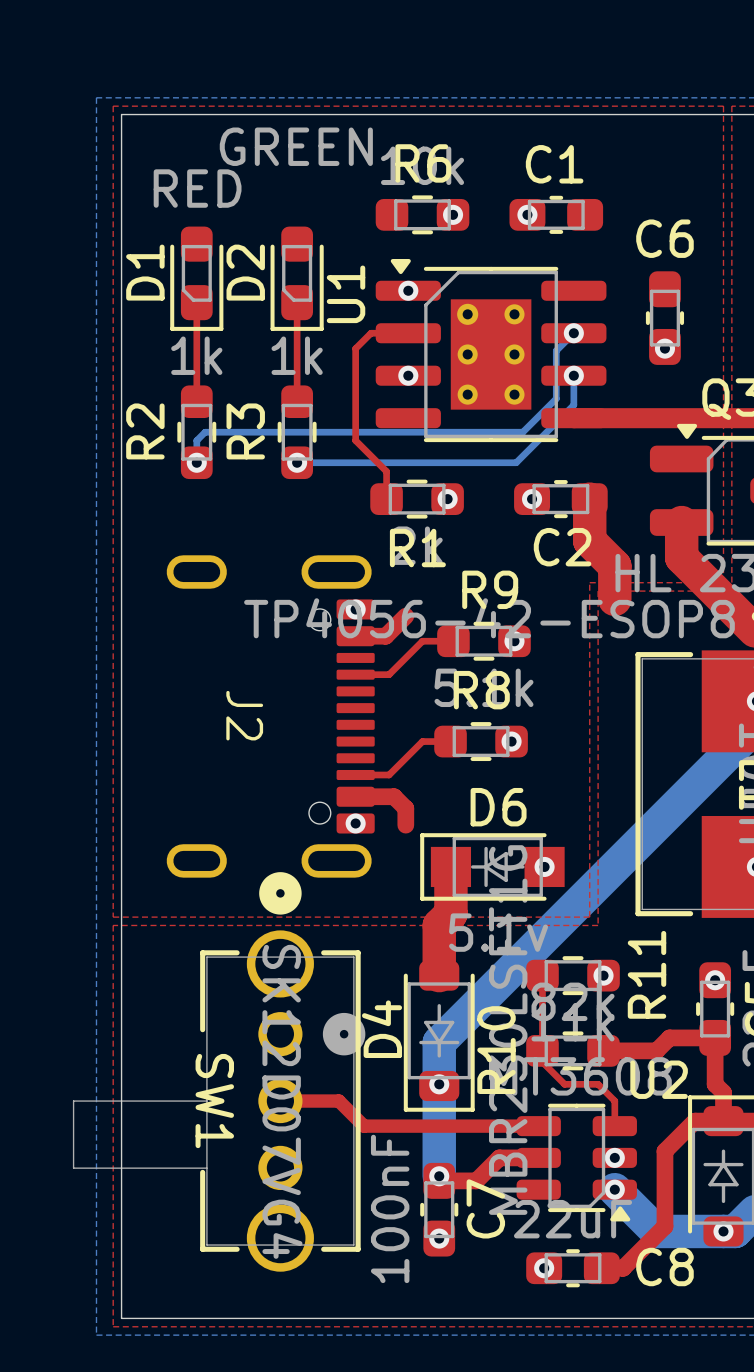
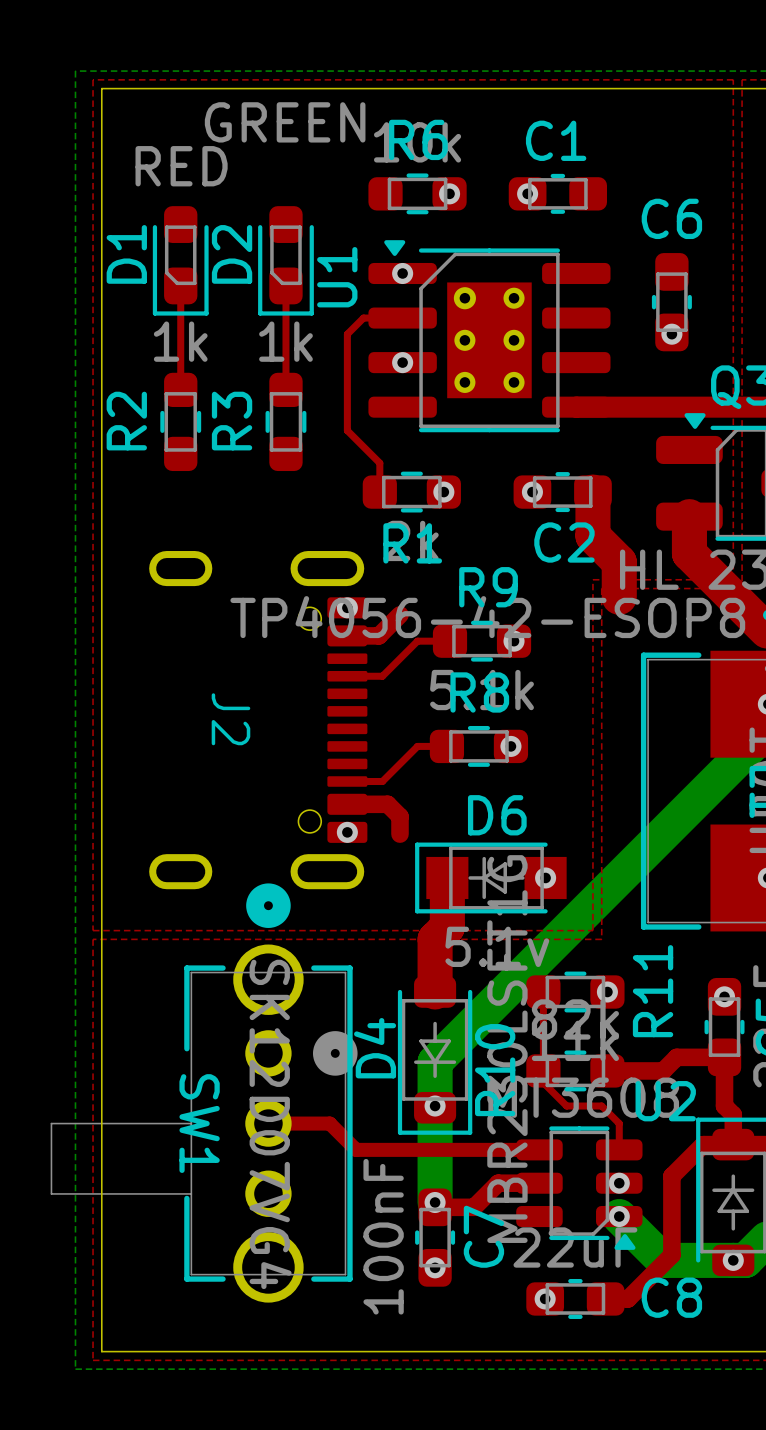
bottom track: (573, 333) (556, 350) (556, 398) (522, 432) (205, 432) (196, 440) (196, 462) -> none
via: (573, 333) -> none
bottom track: (573, 375) (573, 405) (516, 462) (297, 462) -> none
via: (573, 375) -> none
via: (196, 462) -> none
via: (297, 462) -> none

